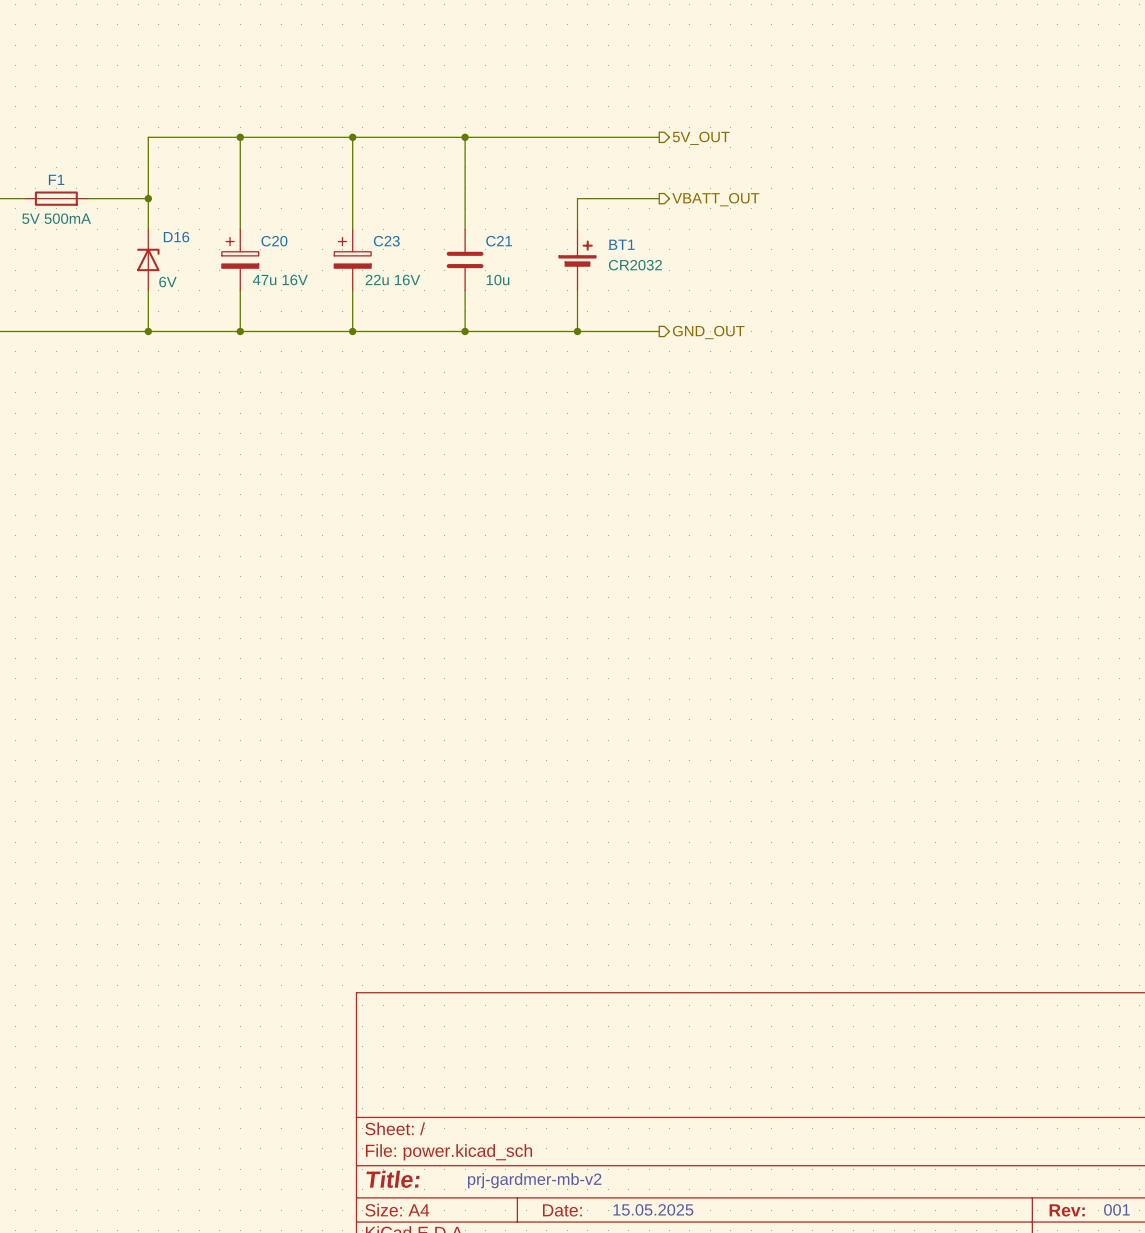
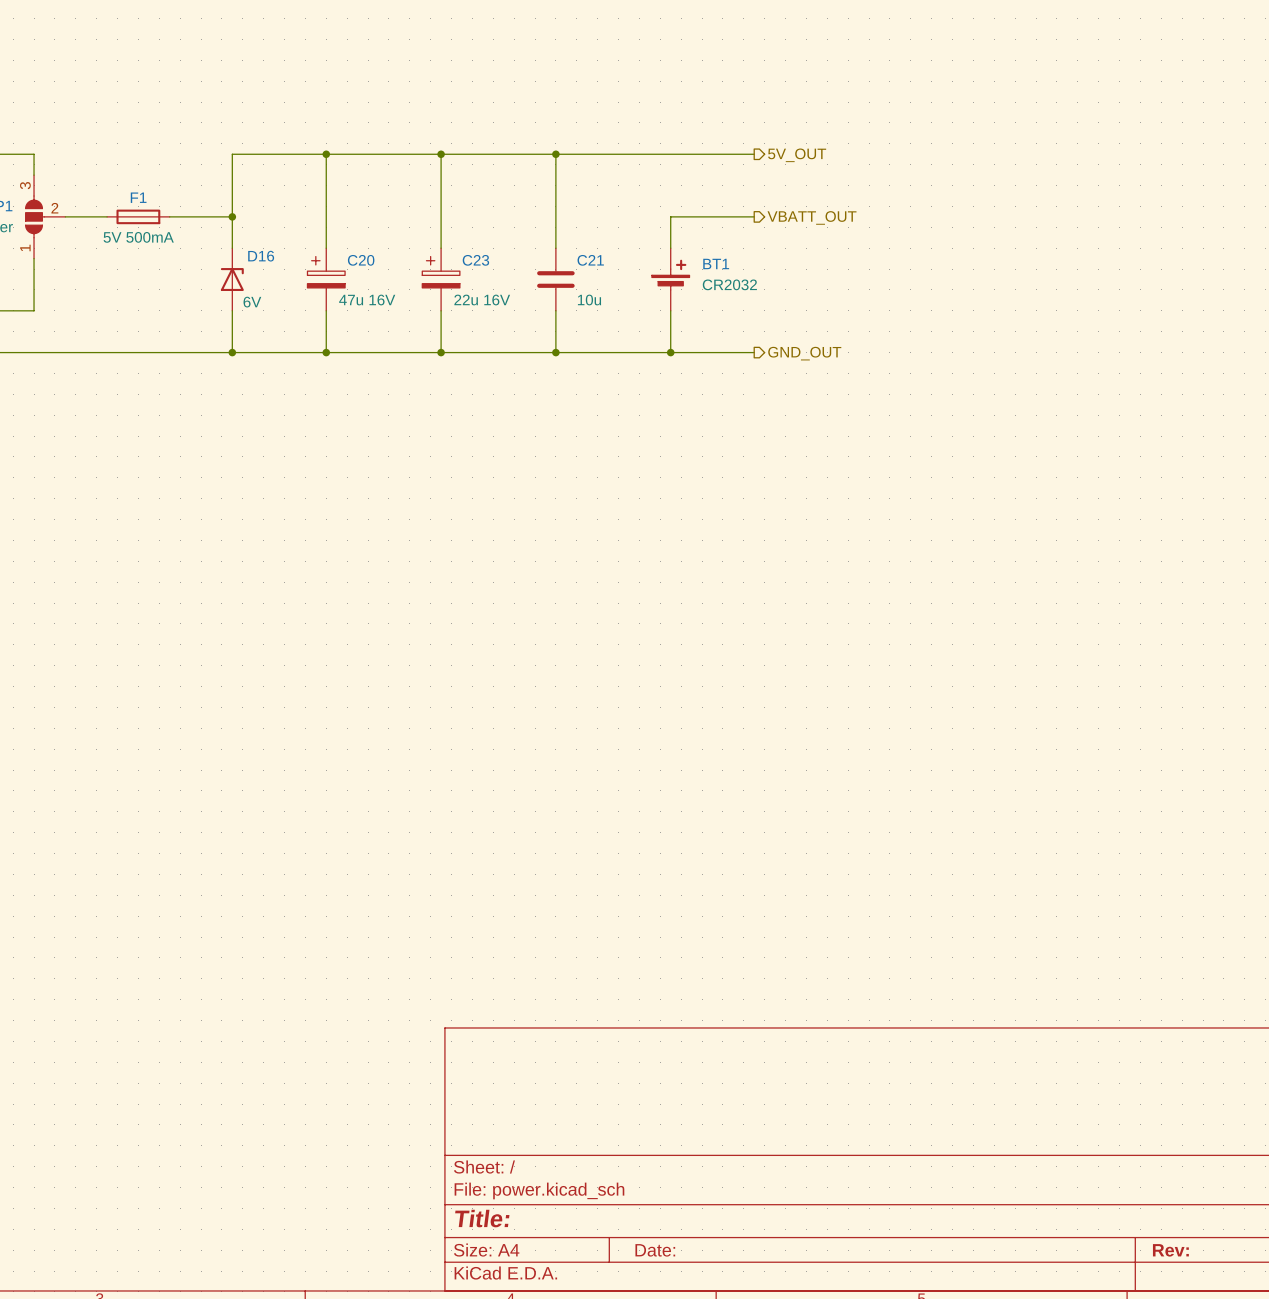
text: prj-gardmer-mb-v2 (534, 1180) -> none
text: 15.05.2025 (653, 1209) -> none
text: 001 (1116, 1209) -> none

